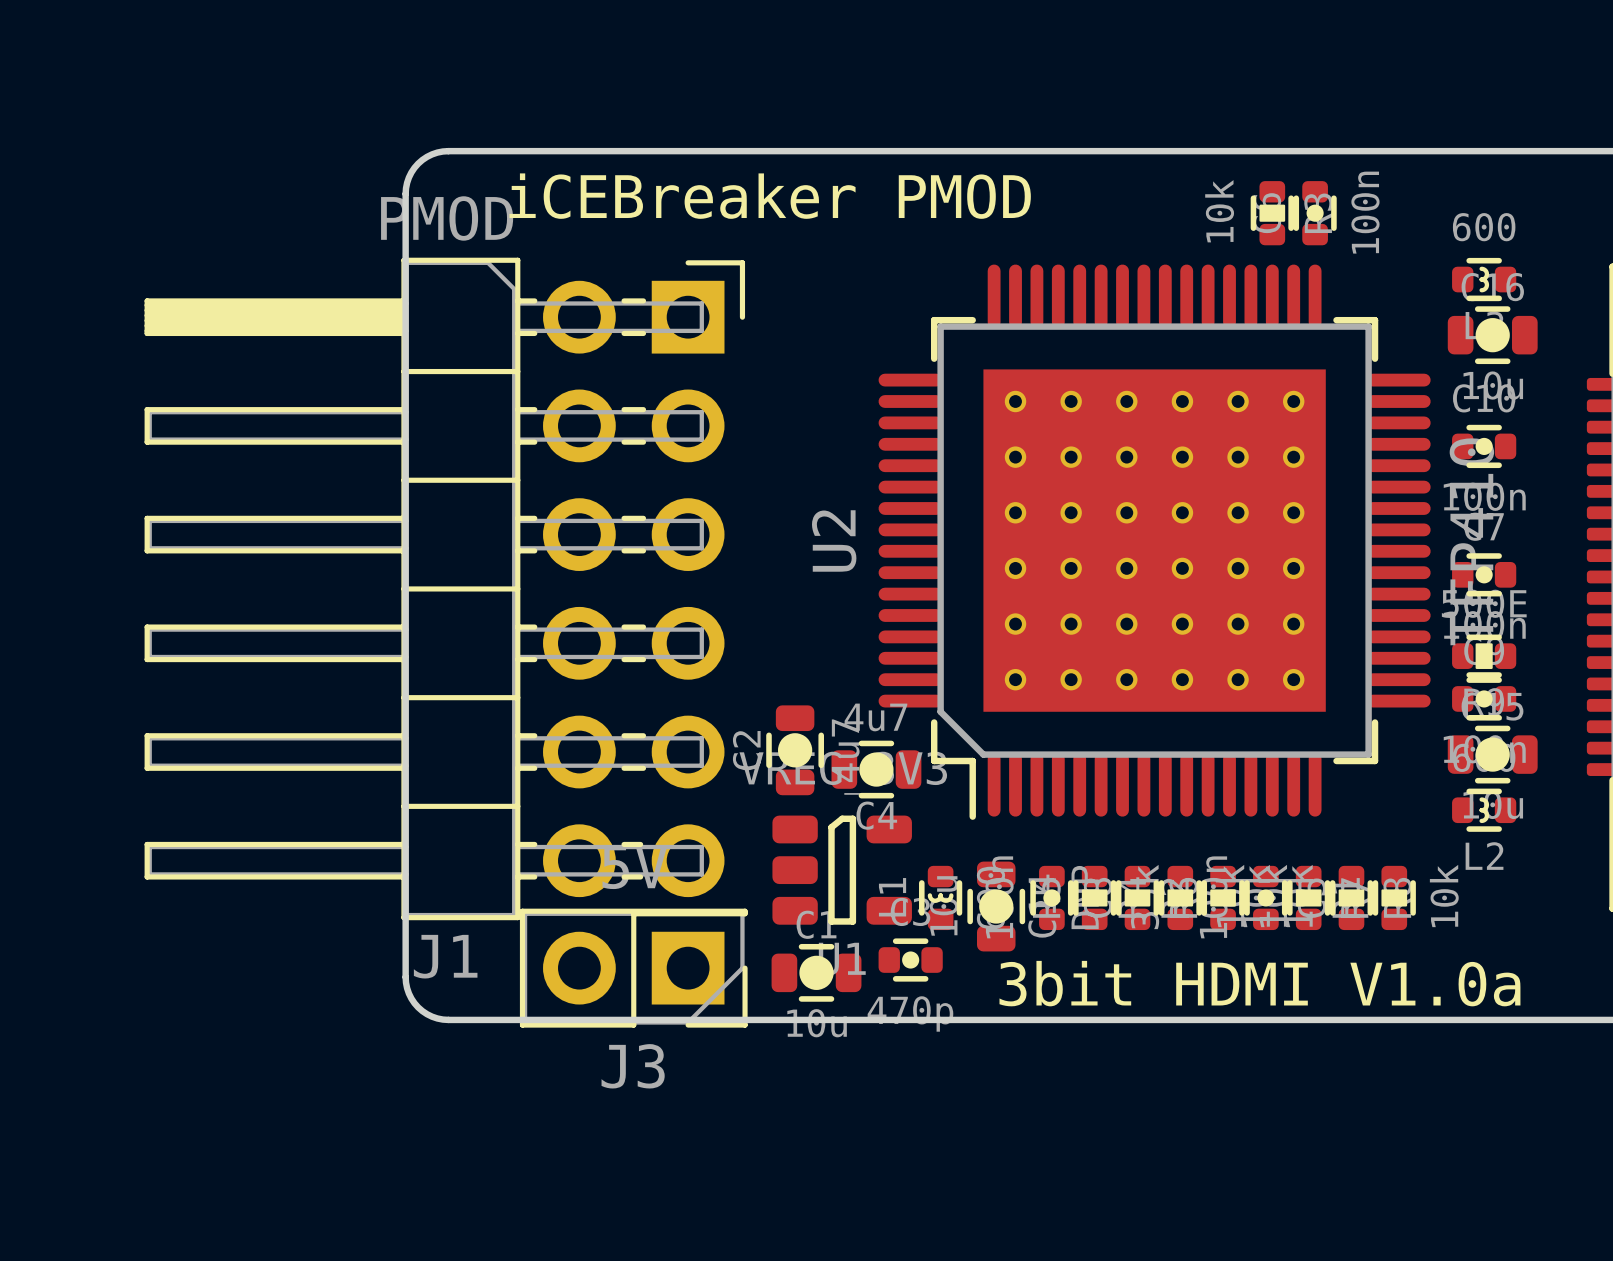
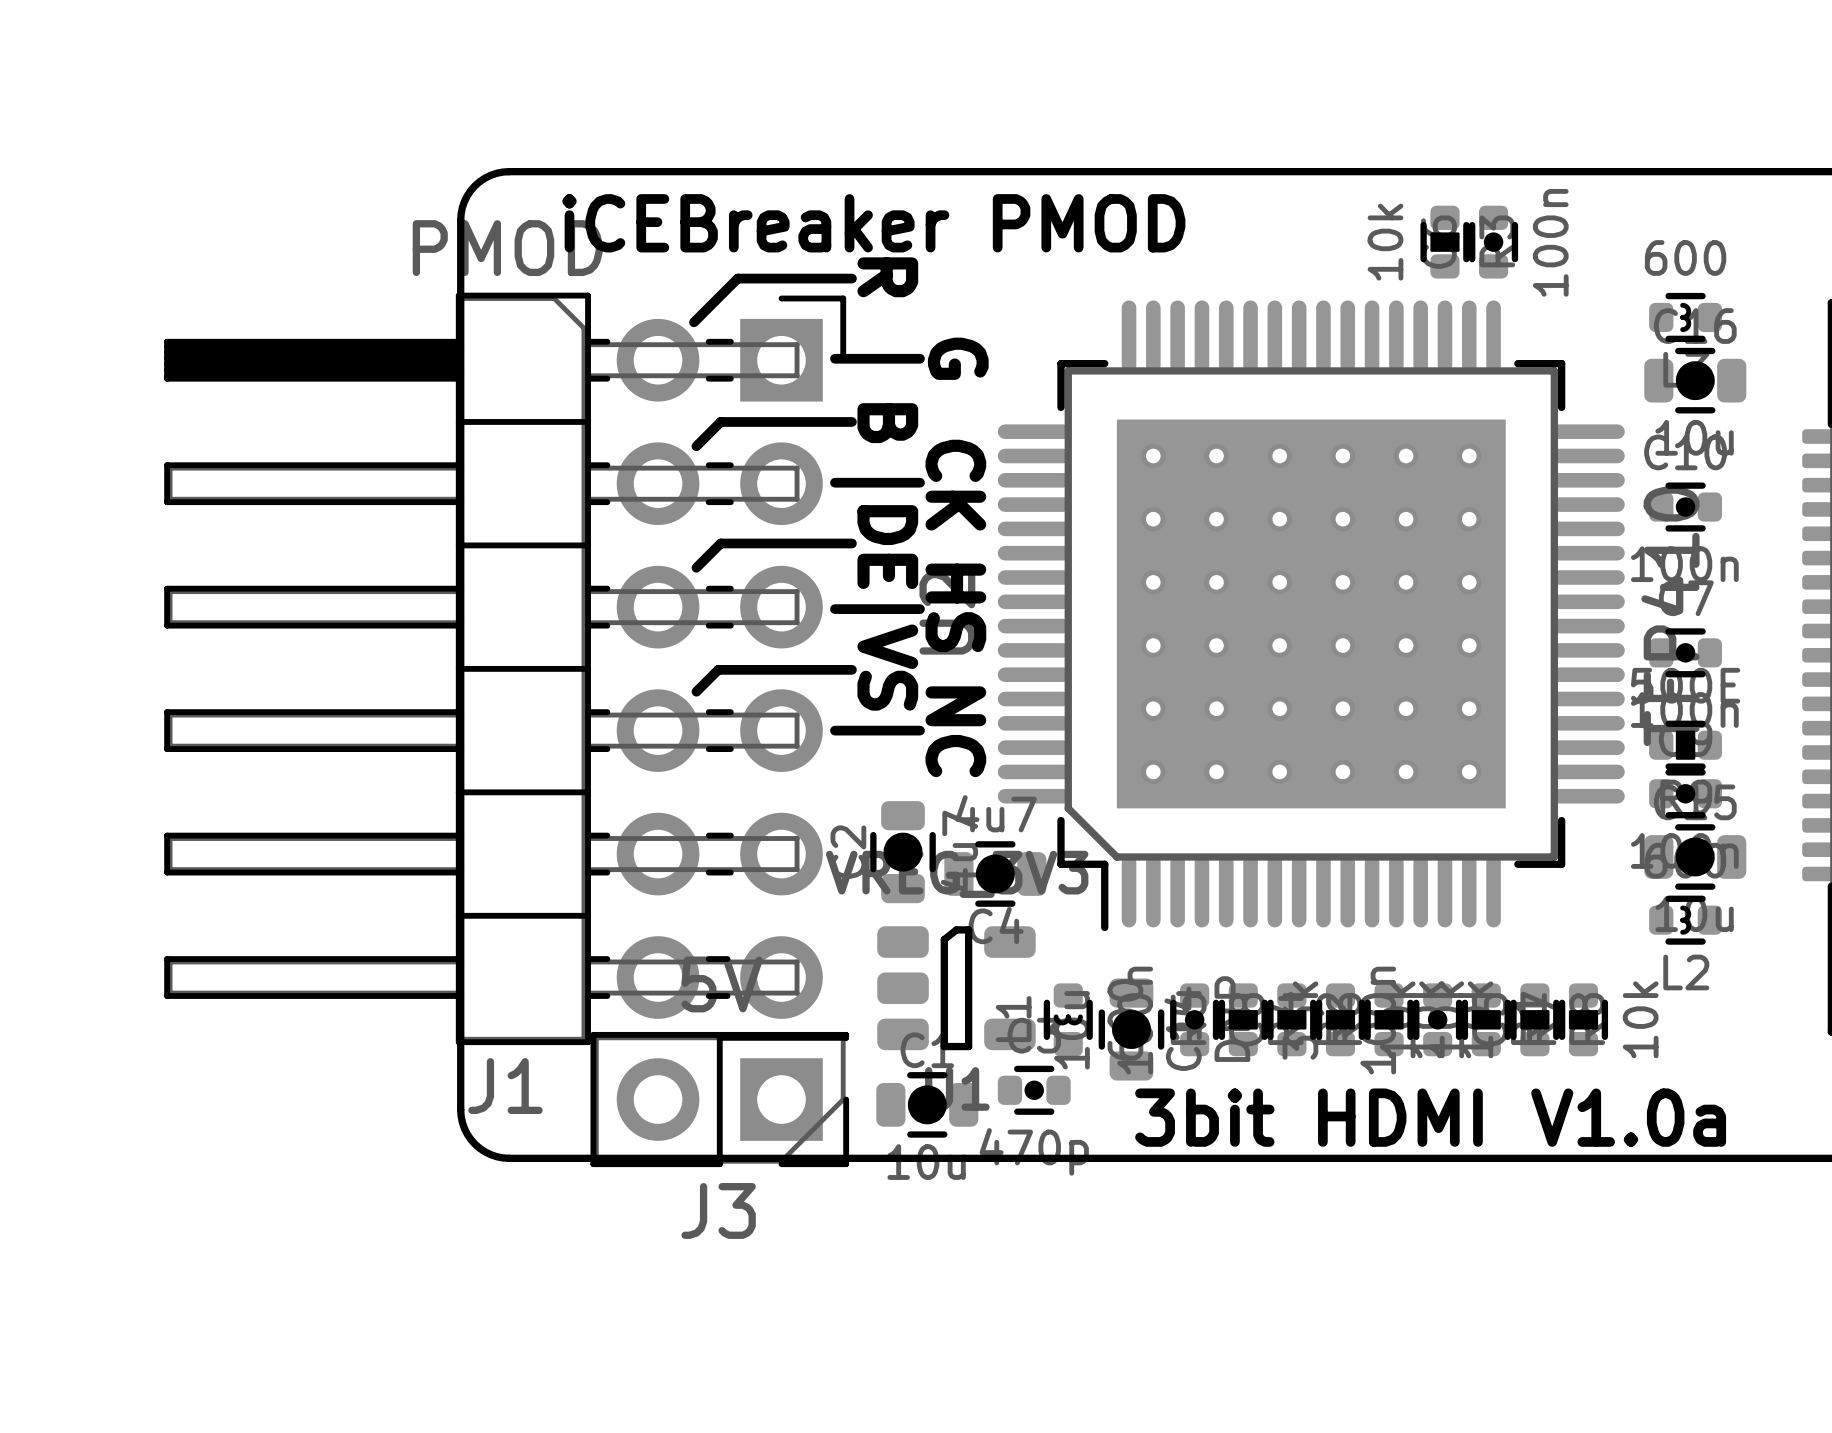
line: none -> (851, 278) (737, 278) (694, 322)
text: none -> R (887, 277)
line: none -> (834, 358) (920, 358)
text: none -> G (958, 358)
line: none -> (851, 421) (720, 421) (696, 446)
text: none -> B (887, 423)
line: none -> (834, 482) (920, 482)
text: none -> CK (955, 485)
line: none -> (851, 543) (720, 543) (696, 567)
text: none -> DE (887, 547)
text: none -> HS (955, 607)
line: none -> (834, 609) (920, 609)
text: none -> VS (887, 667)
line: none -> (851, 669) (718, 669) (696, 691)
line: none -> (834, 730) (920, 730)
text: none -> NC (955, 731)

